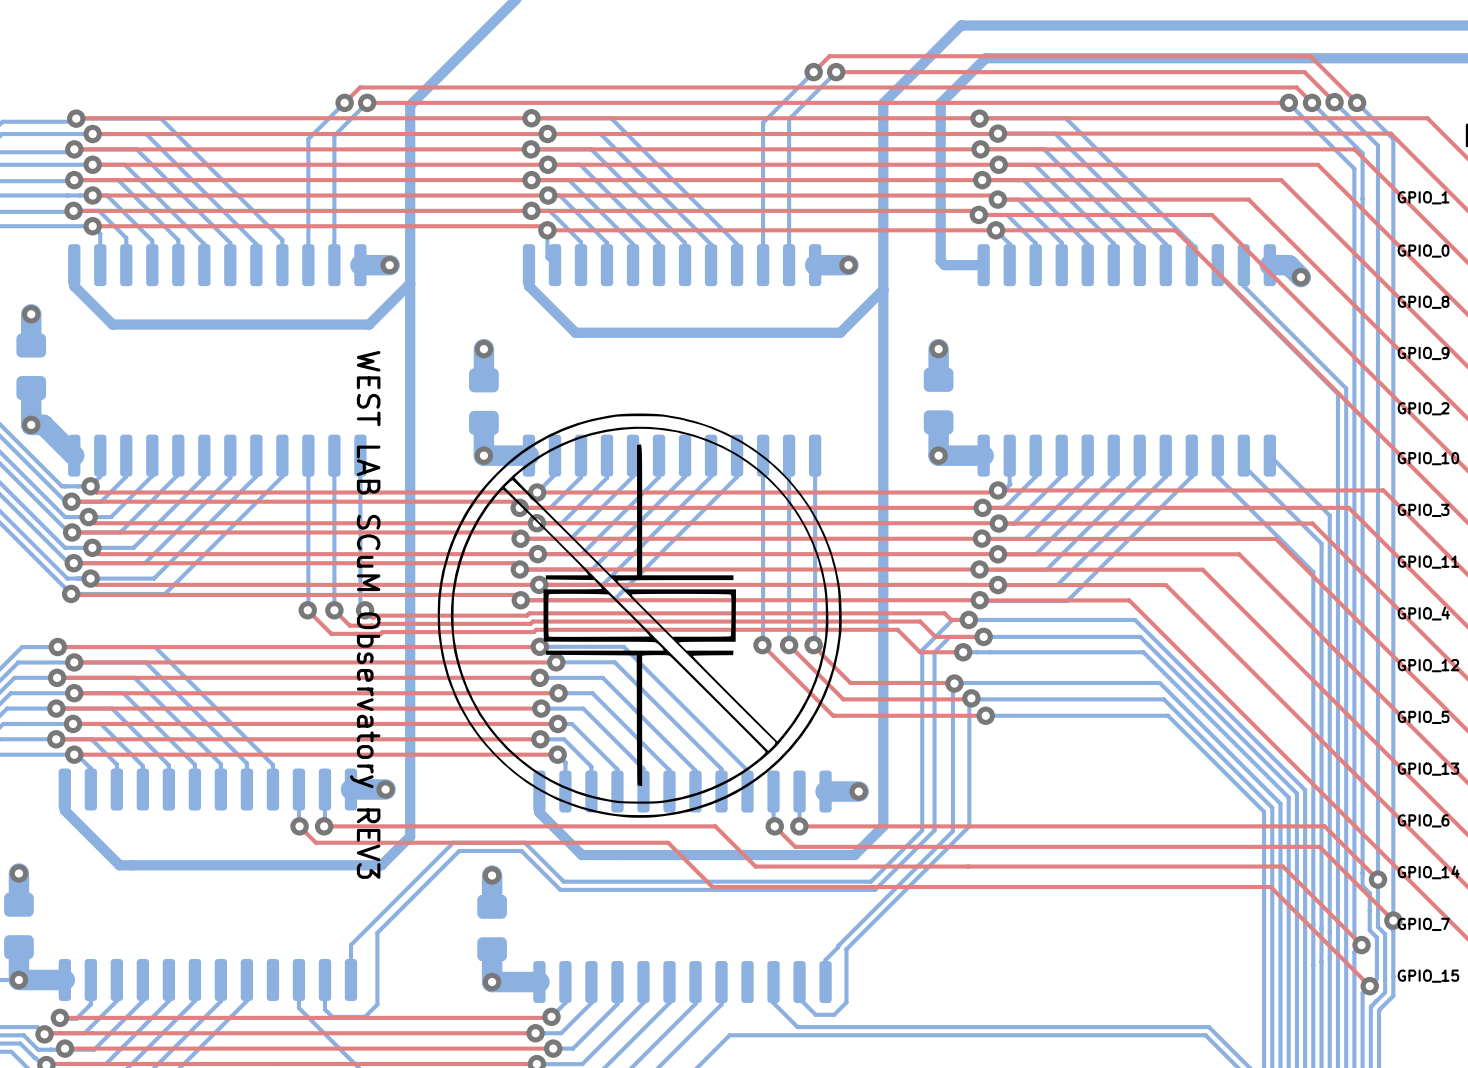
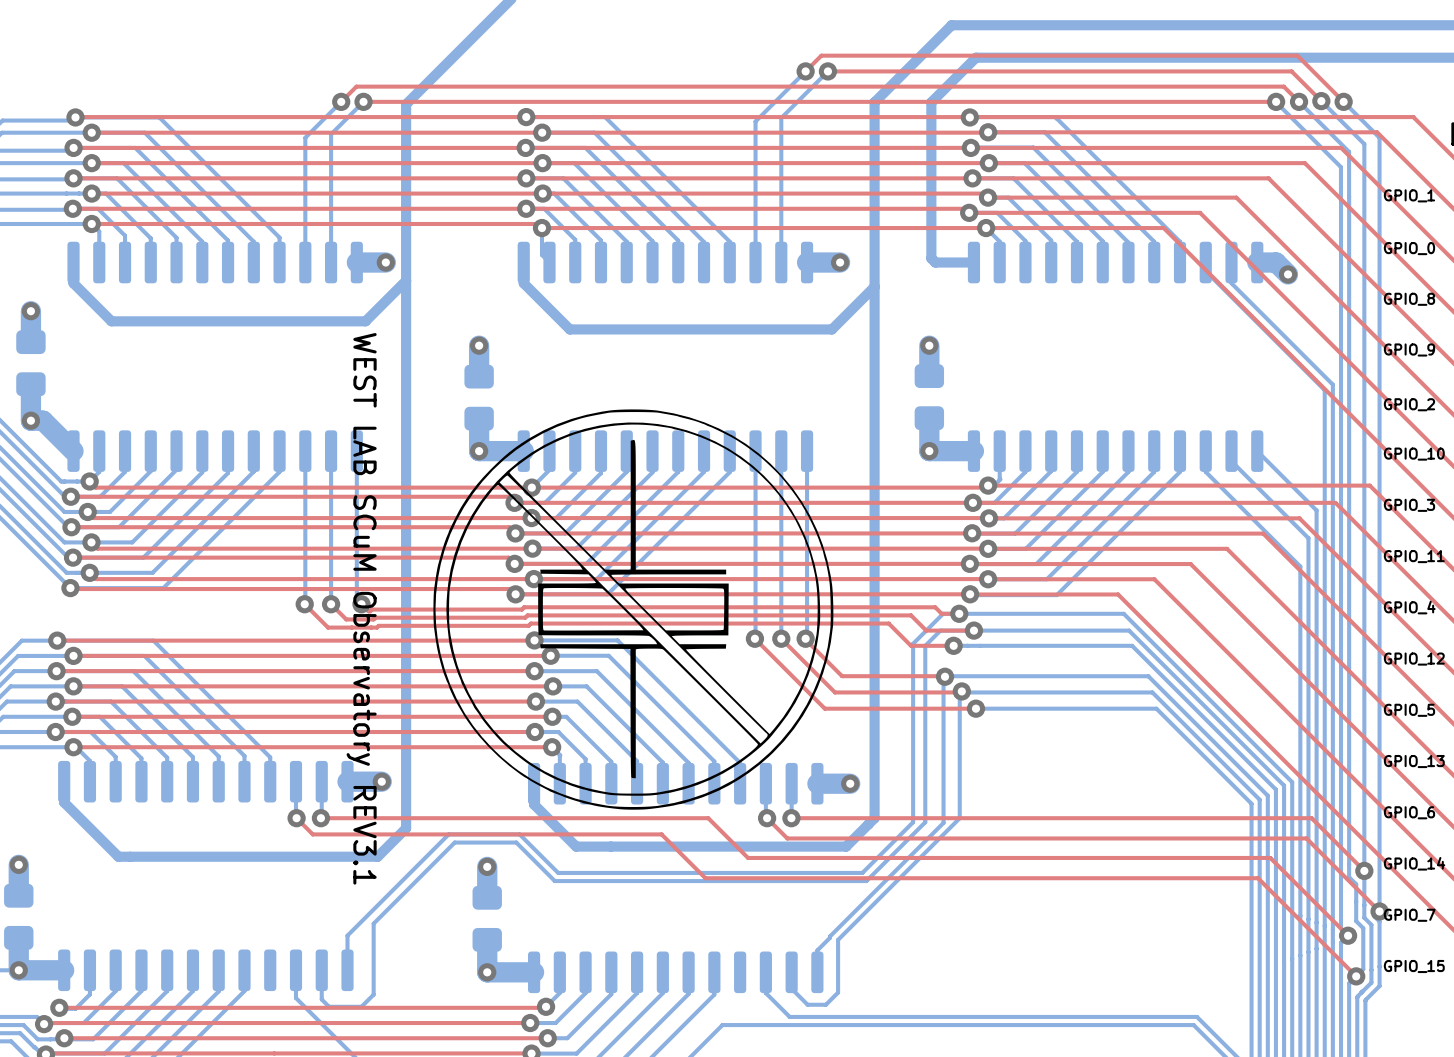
text: WEST LAB SCuM Observatory REV3 (365, 614) -> WEST LAB SCuM Observatory REV3.1 (361, 608)

